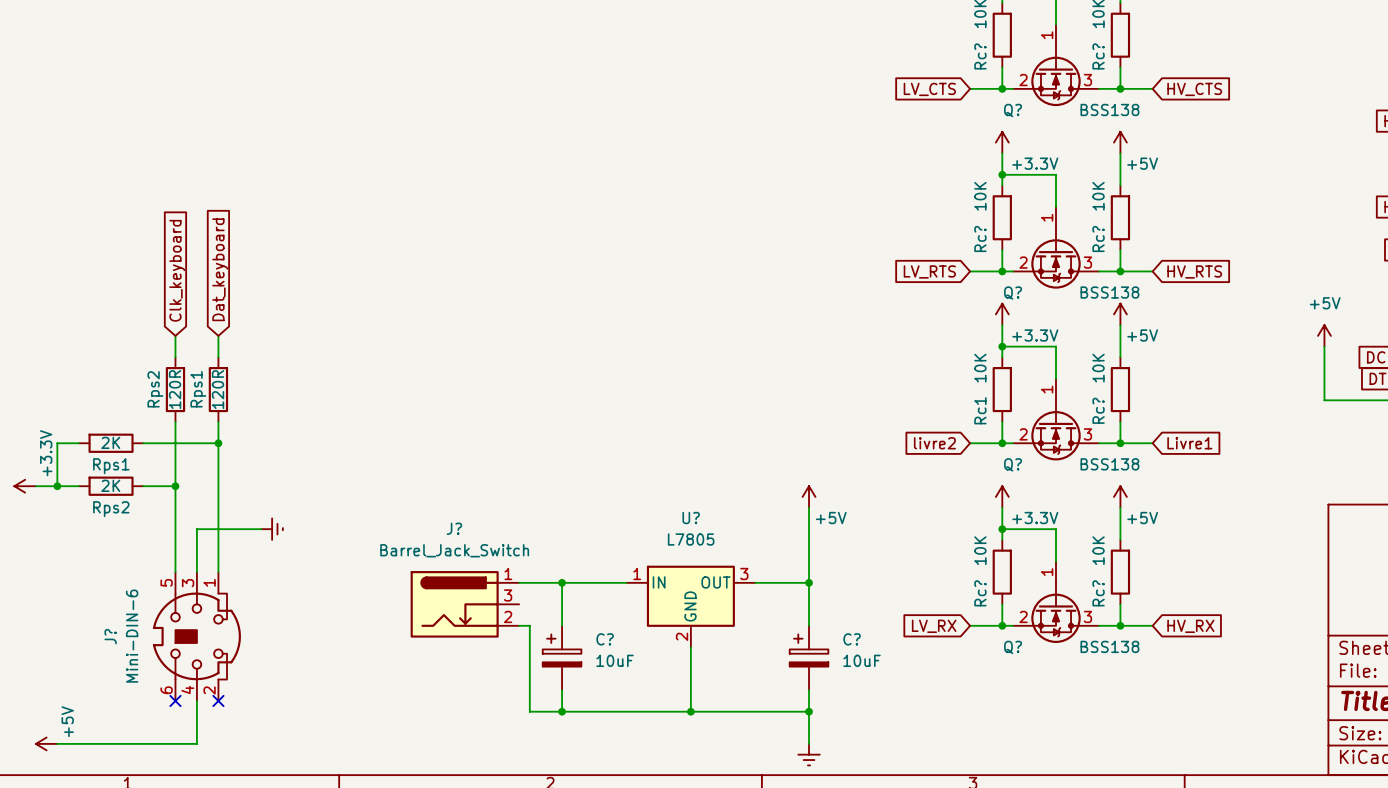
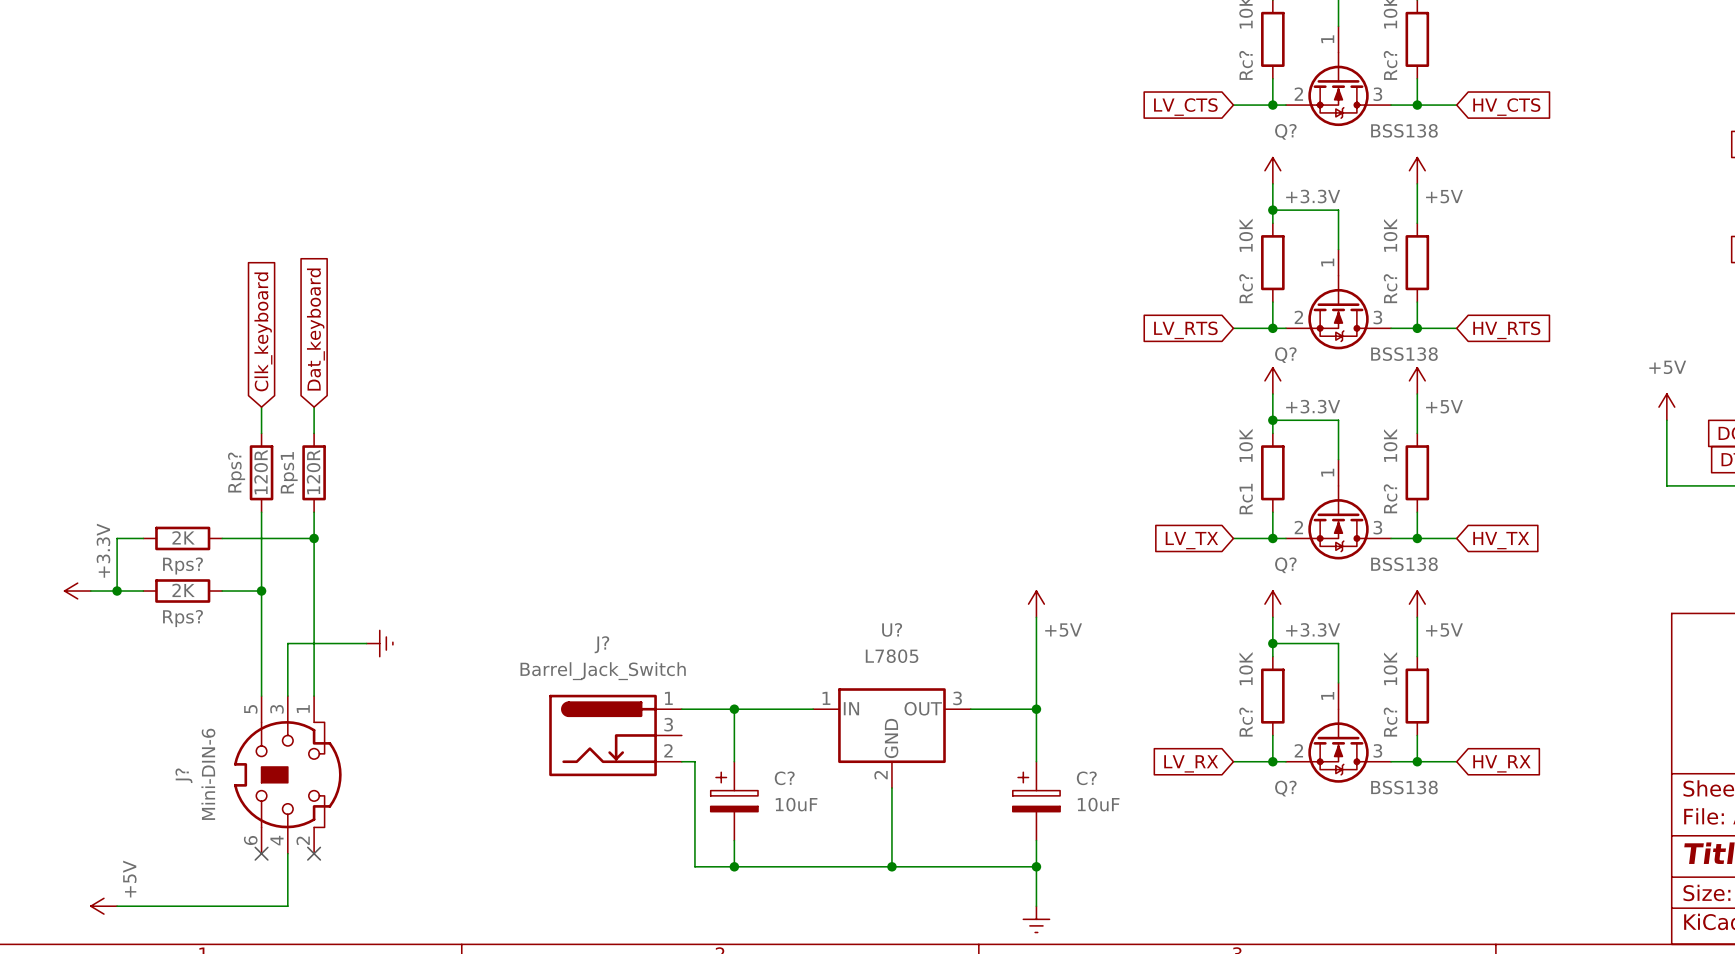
Rps2 name: Rps2 (155, 389) -> Rps? (236, 472)
global label: livre2 (934, 443) -> LV_TX (1191, 540)
global label: Livre1 (1189, 443) -> HV_TX (1501, 540)
Rps1 name: Rps1 (111, 466) -> Rps? (183, 566)
Rps2 name: Rps2 (111, 509) -> Rps? (183, 618)

